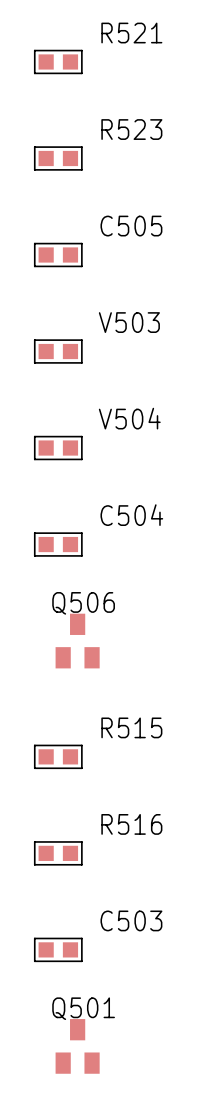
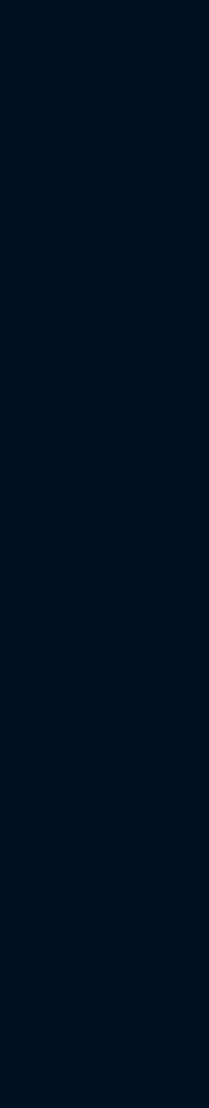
R521: (58, 61) -> none
R523: (58, 158) -> none
C505: (58, 255) -> none
V503: (58, 351) -> none
V504: (58, 448) -> none
C504: (58, 544) -> none
Q506: (77, 641) -> none
R515: (58, 756) -> none
R516: (58, 853) -> none
C503: (58, 949) -> none
Q501: (77, 1046) -> none

